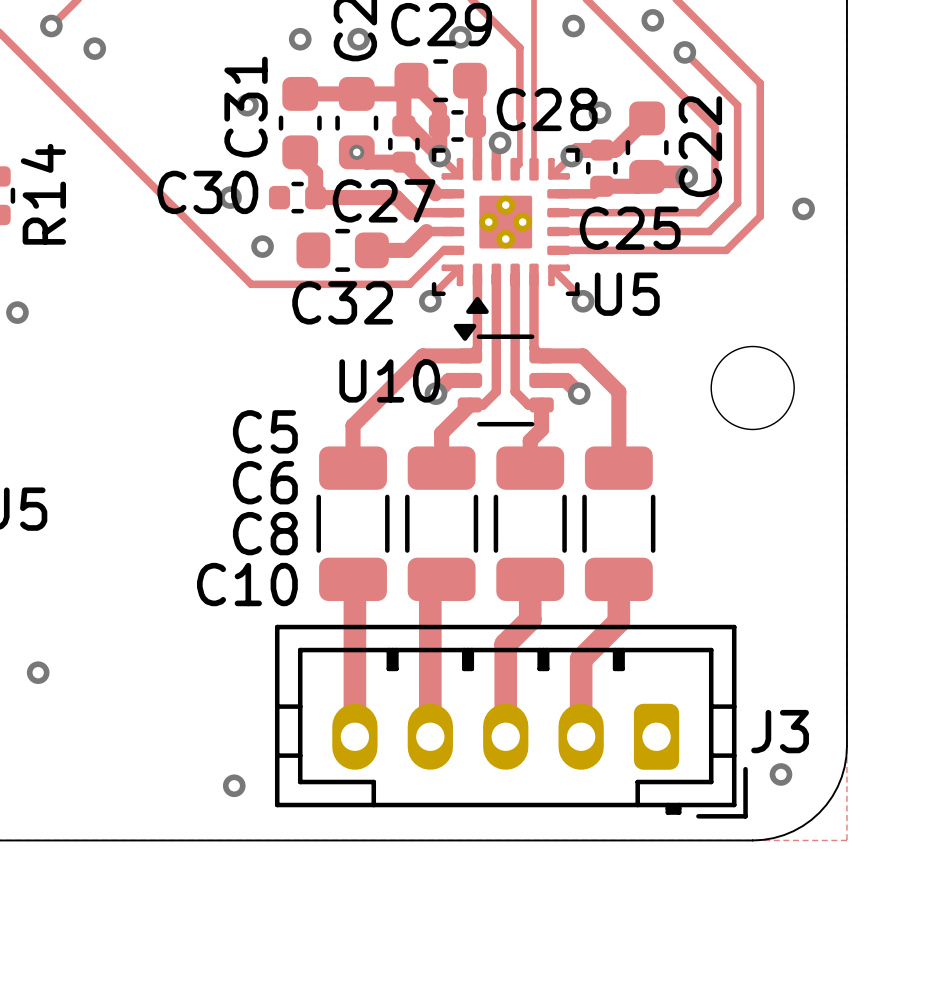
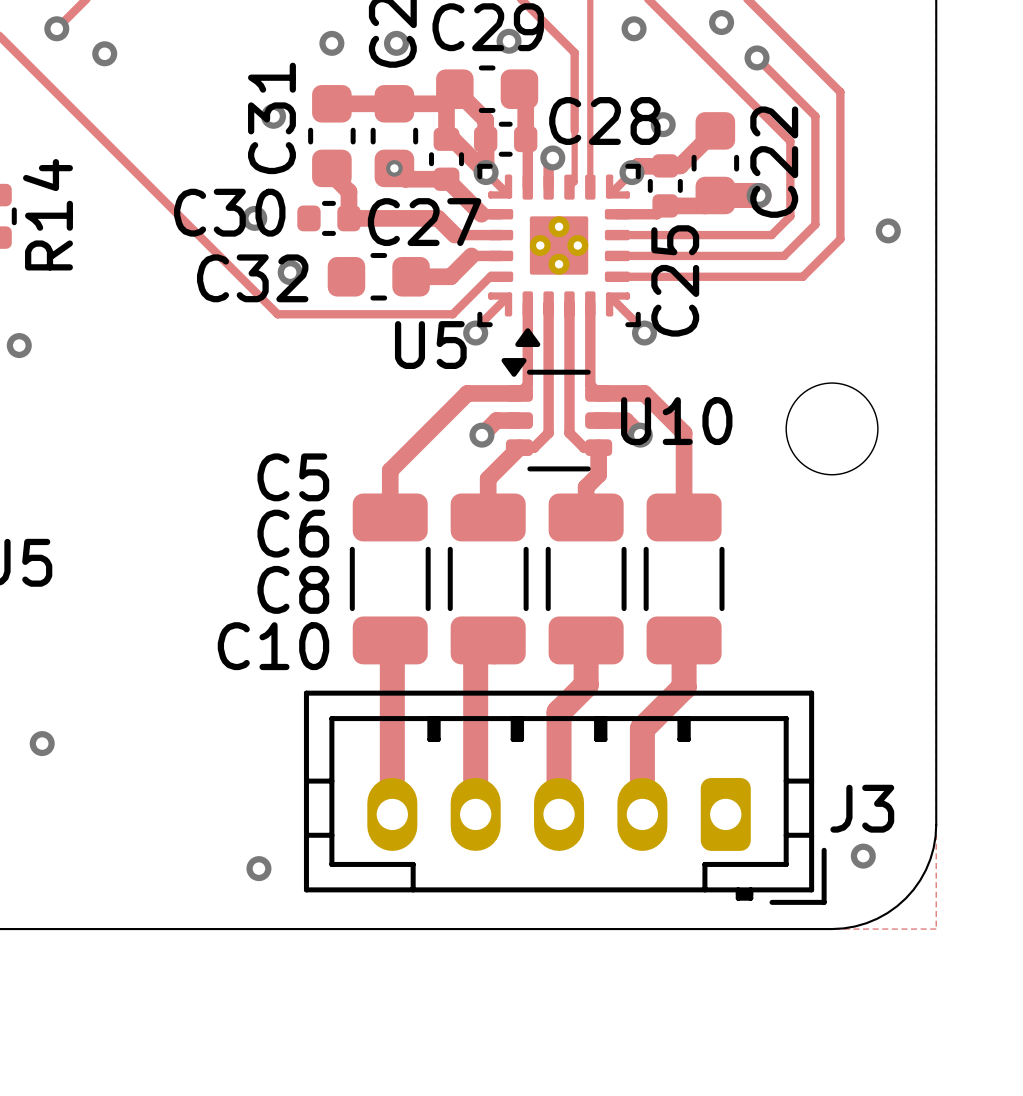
C25 name rotation: 0° (630, 228) -> 90° counterclockwise (675, 280)
U5 name position: U5 (627, 294) -> U5 (430, 345)
C32 name position: C32 (342, 302) -> C32 (252, 278)
U10 name position: U10 (389, 380) -> U10 (676, 421)

